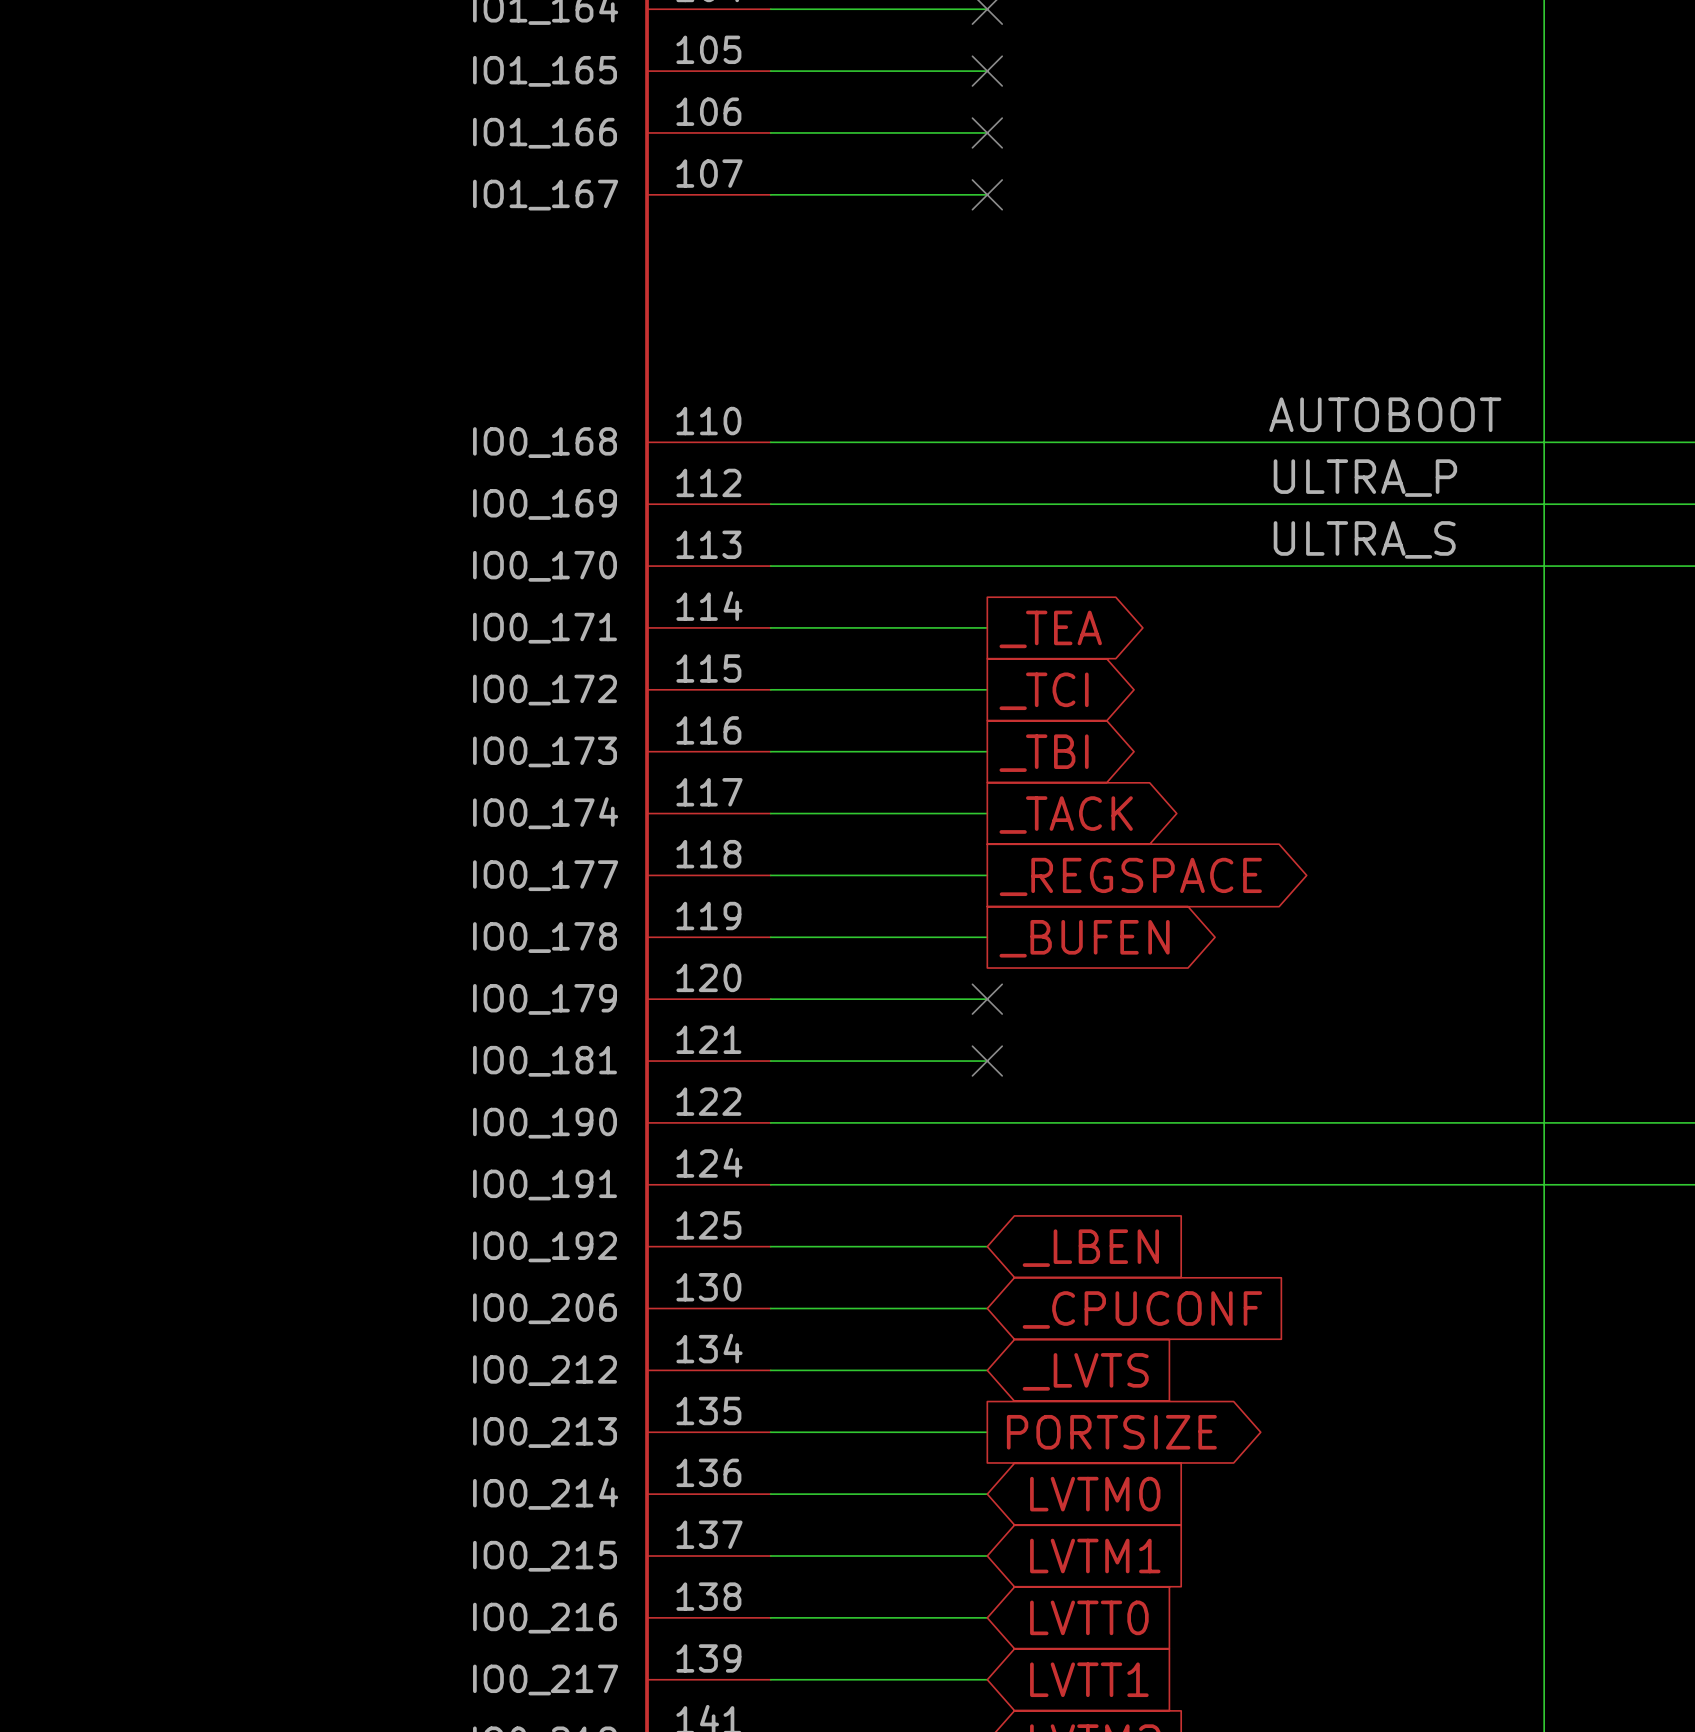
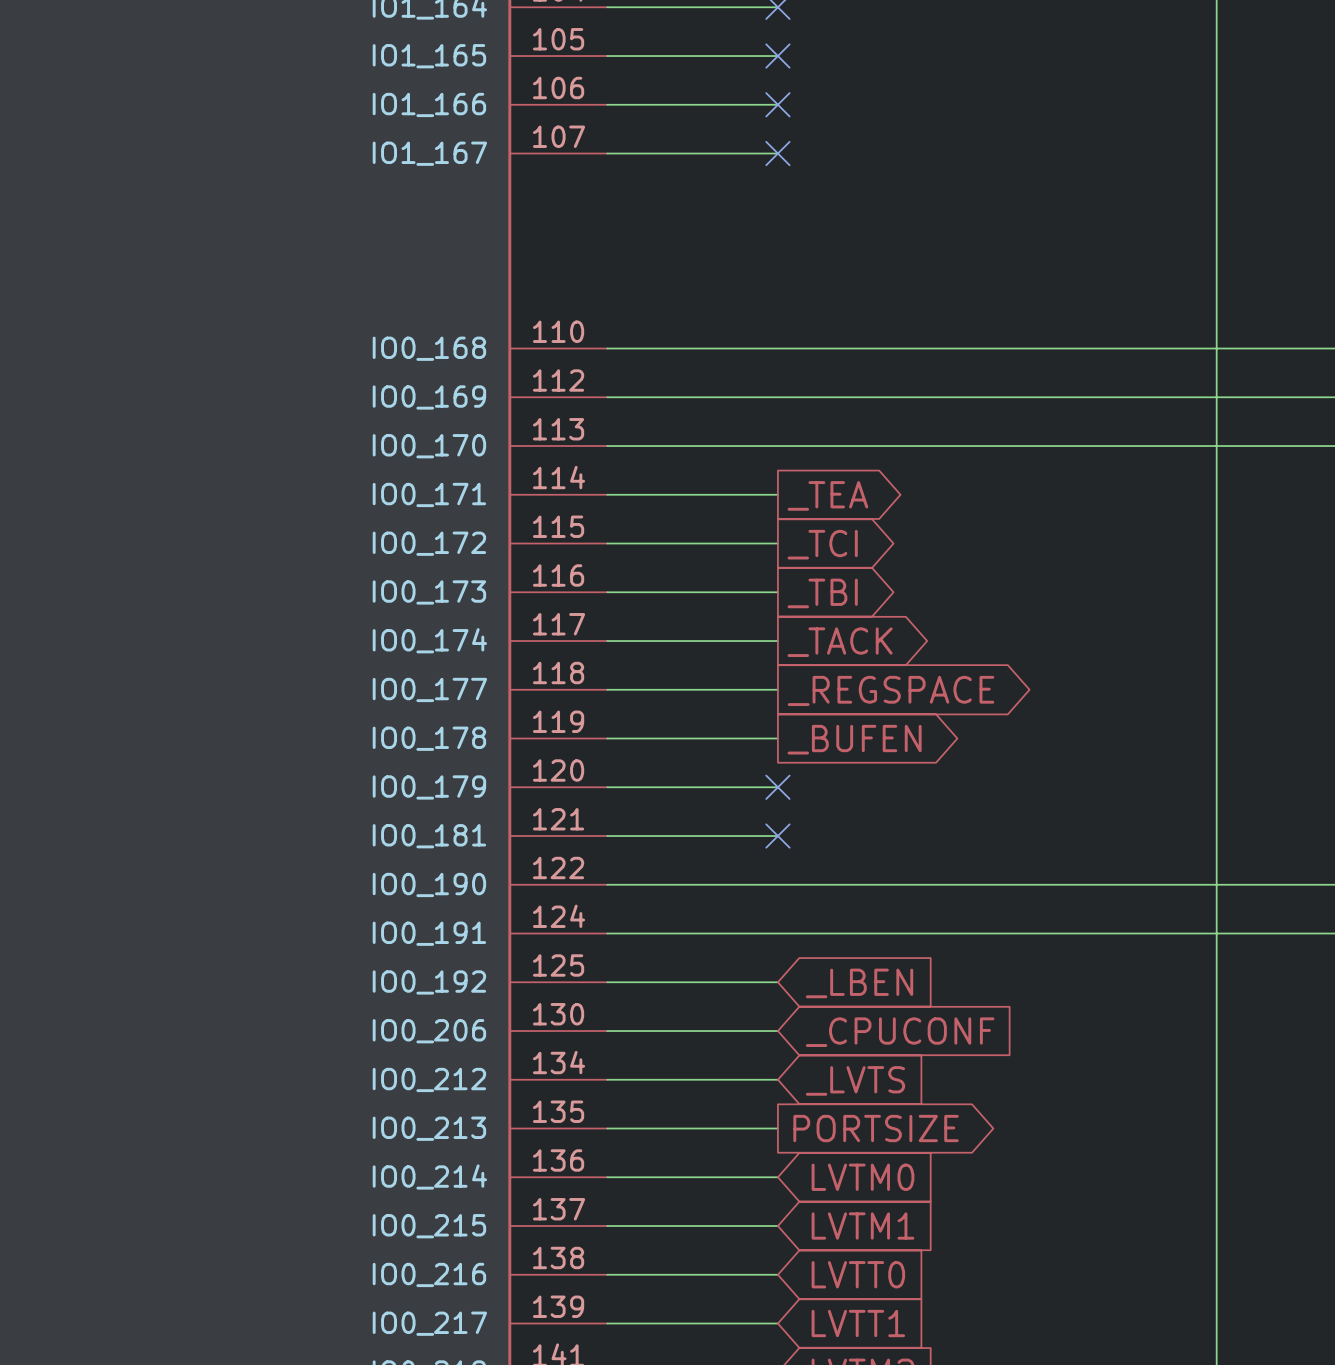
label: AUTOBOOT (1385, 414) -> none
label: ULTRA_P (1365, 478) -> none
label: ULTRA_S (1364, 539) -> none

